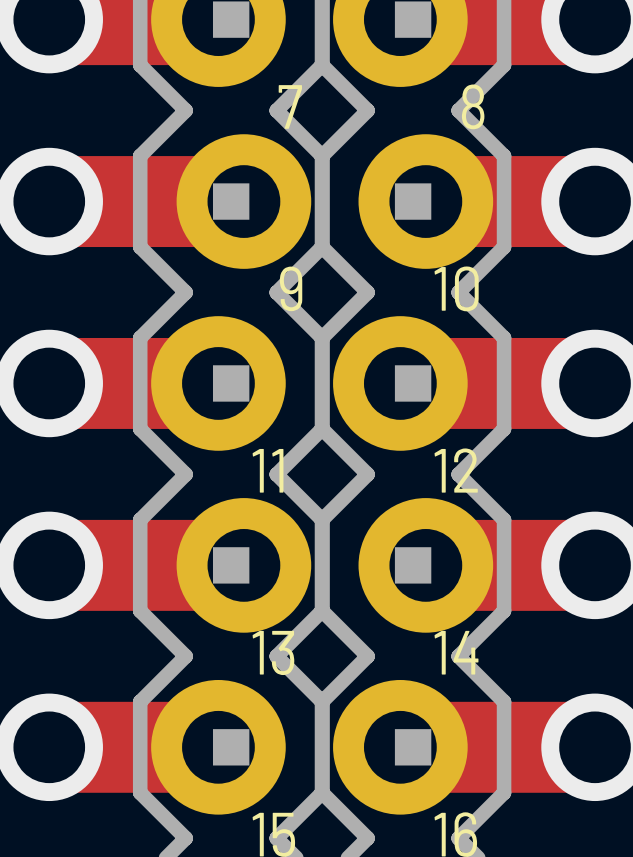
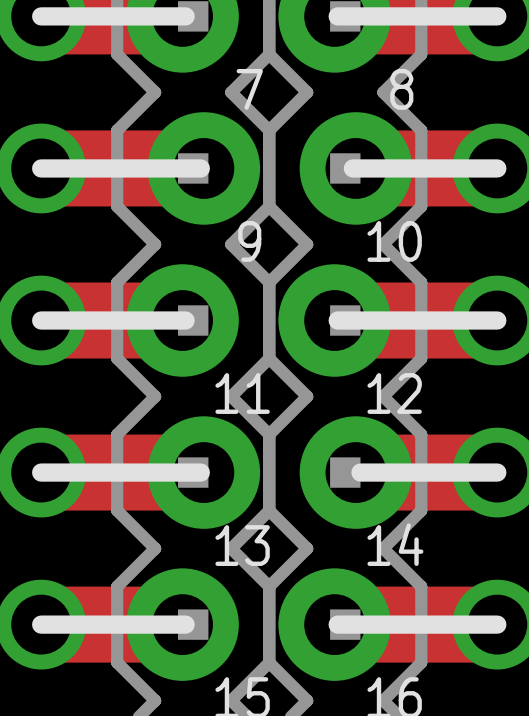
line: none -> (41, 16) (185, 16)
line: none -> (337, 16) (497, 16)
line: none -> (41, 168) (200, 168)
line: none -> (352, 168) (497, 168)
line: none -> (41, 320) (185, 320)
line: none -> (337, 320) (497, 320)
line: none -> (41, 472) (200, 472)
line: none -> (360, 472) (497, 472)
line: none -> (41, 624) (185, 624)
line: none -> (337, 624) (497, 624)

